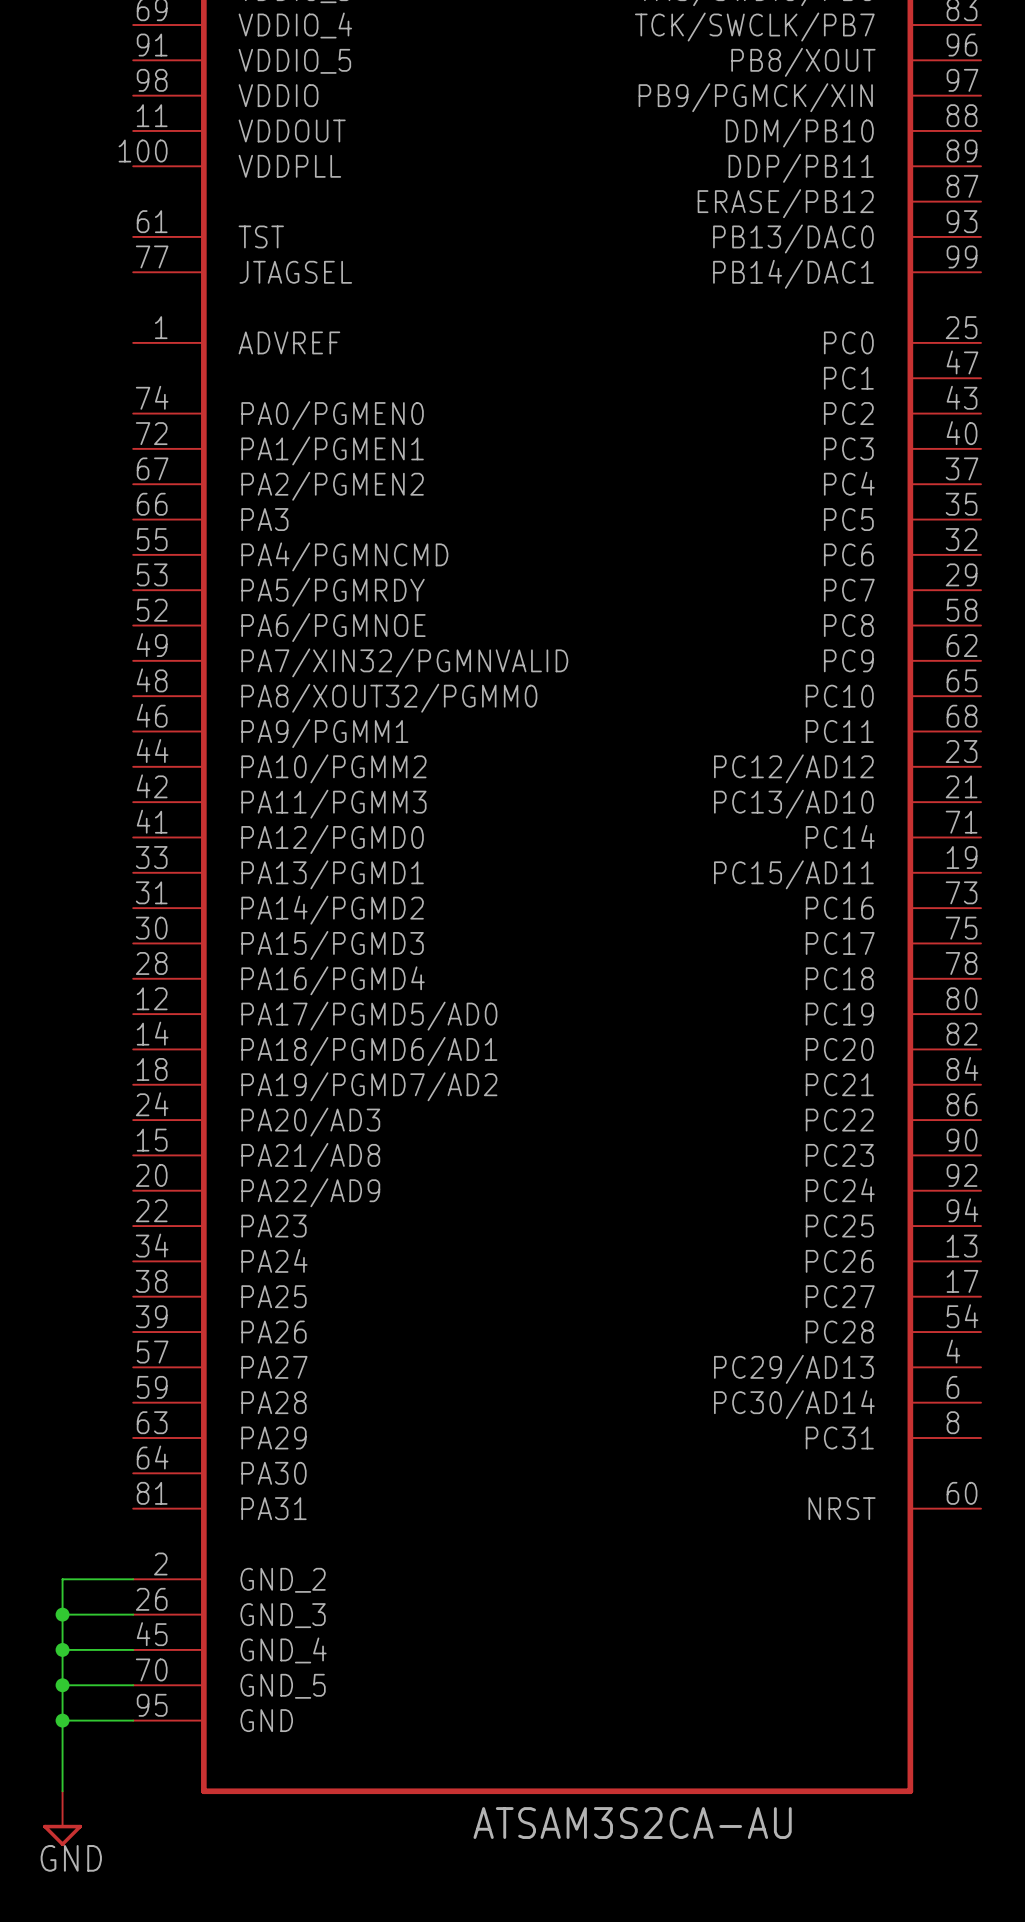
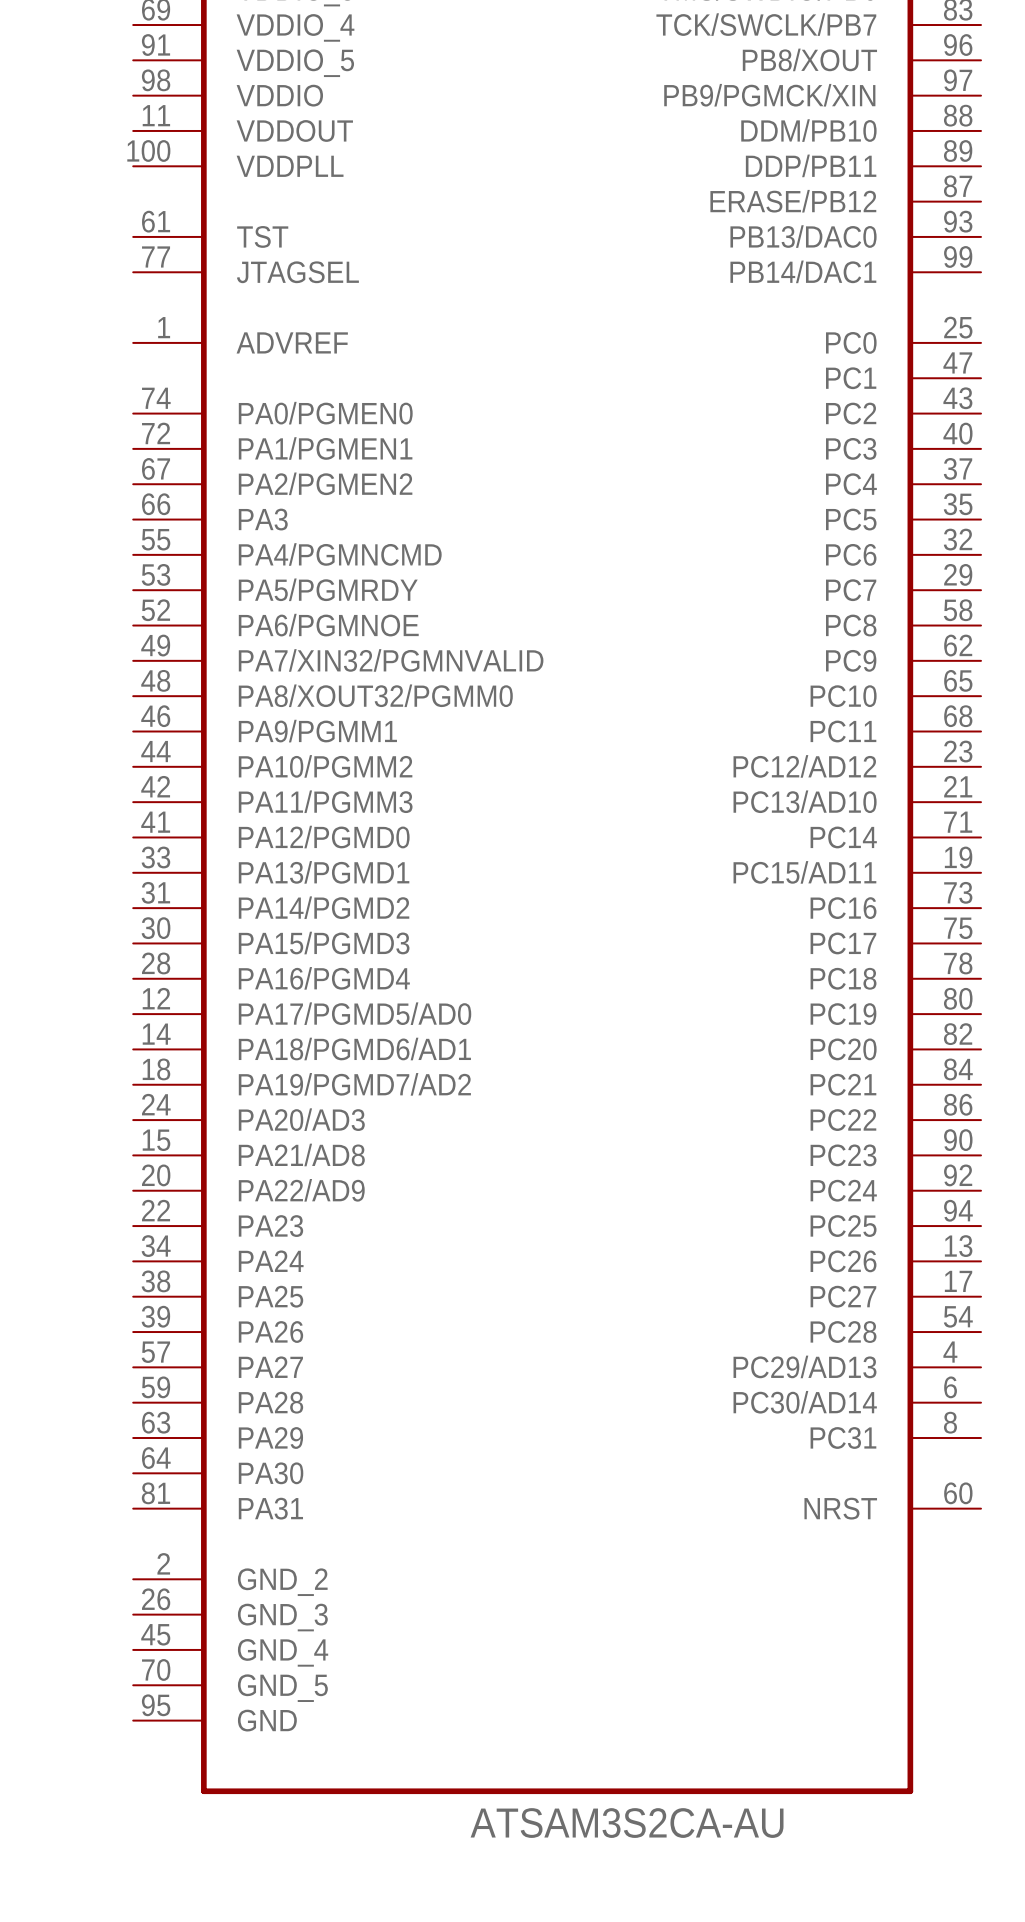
wire: (133, 1579) (62, 1579) (62, 1791) -> none
wire: (62, 1614) (133, 1614) -> none
junction: (62, 1614) -> none
wire: (62, 1649) (133, 1649) -> none
junction: (62, 1649) -> none
wire: (62, 1685) (133, 1685) -> none
junction: (62, 1685) -> none
wire: (62, 1720) (133, 1720) -> none
junction: (62, 1720) -> none
power symbol: GND (62, 1818) -> none

